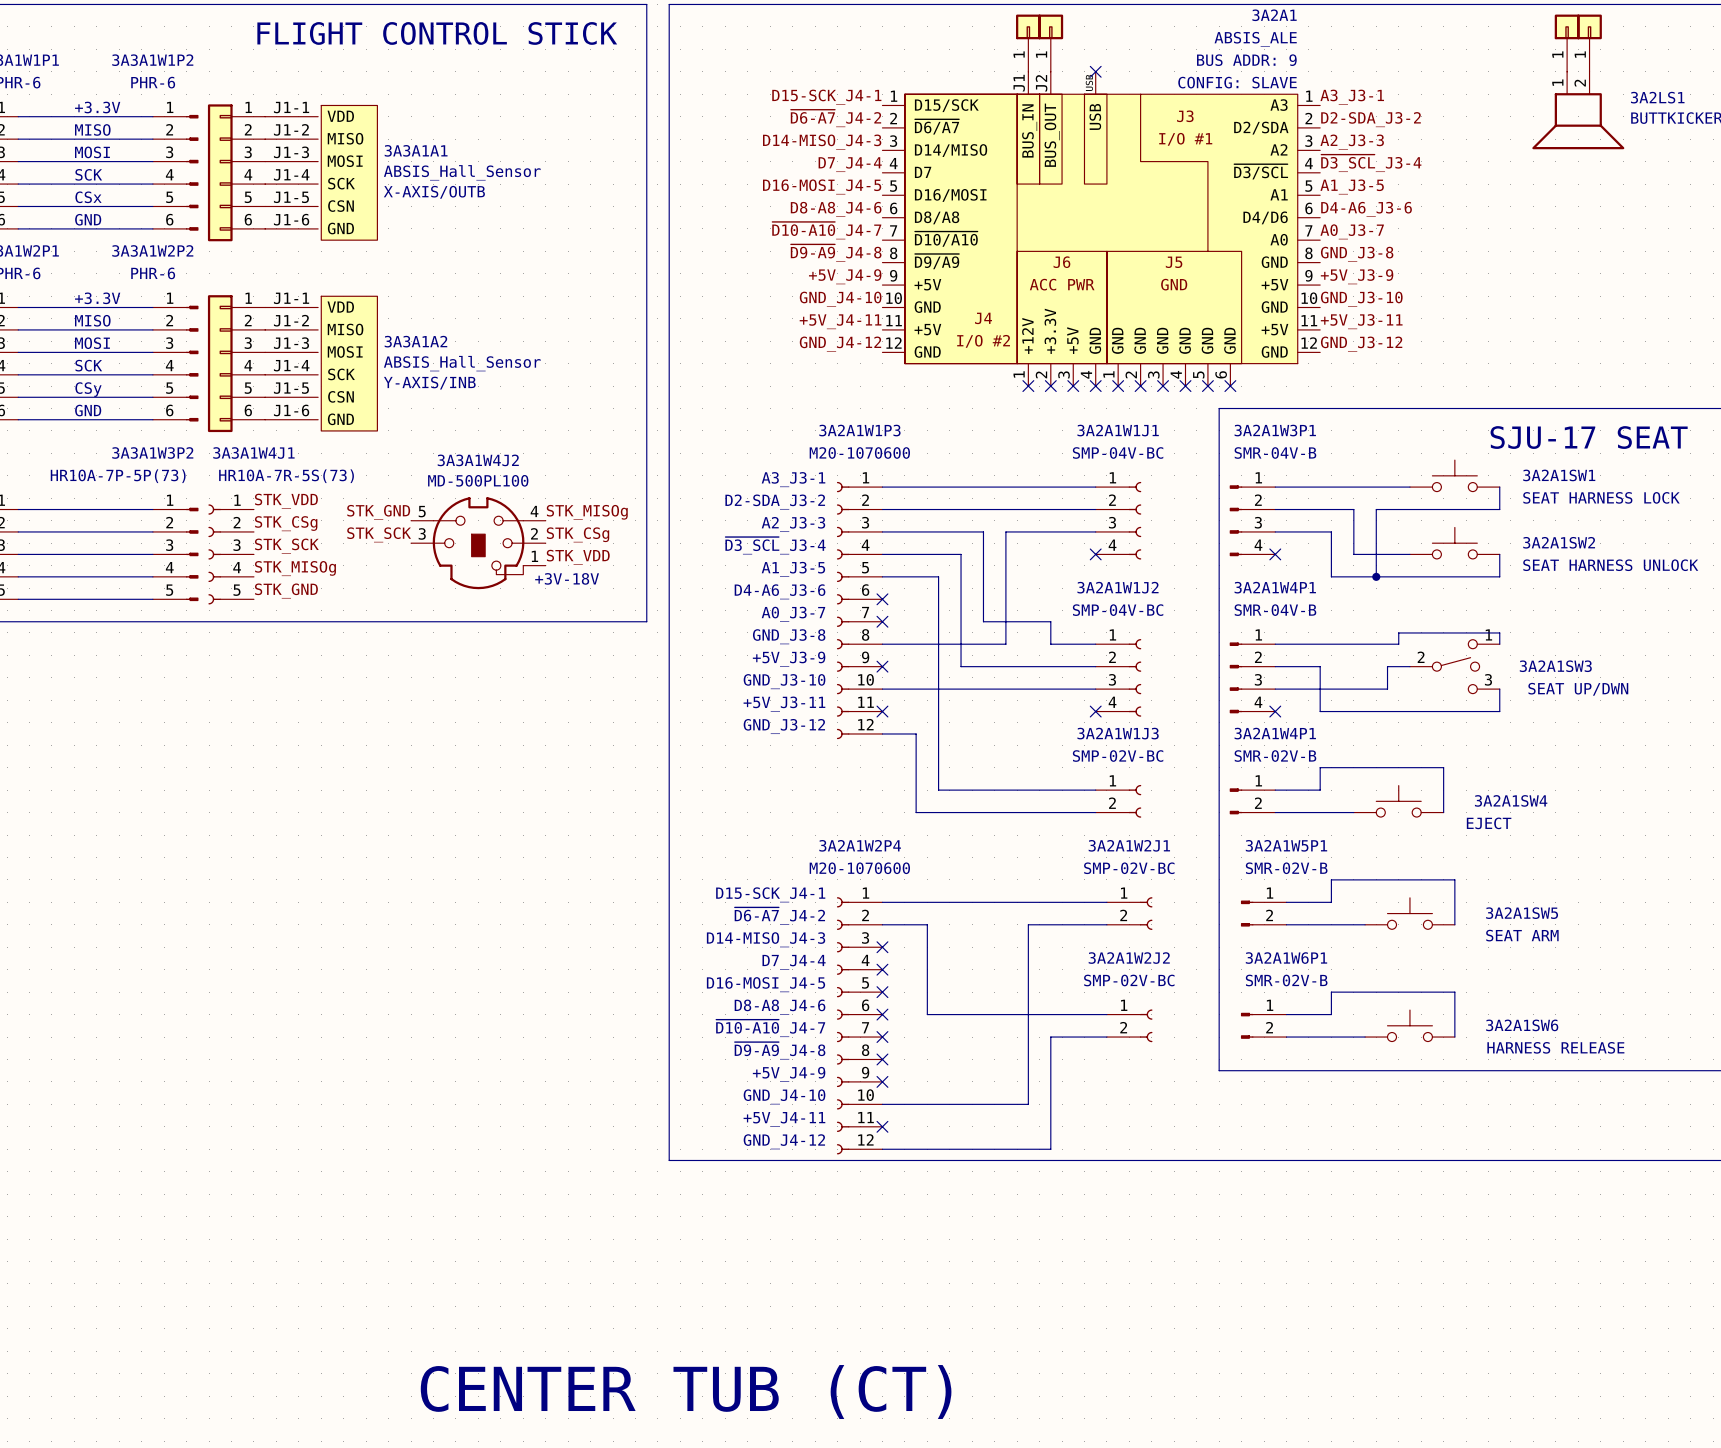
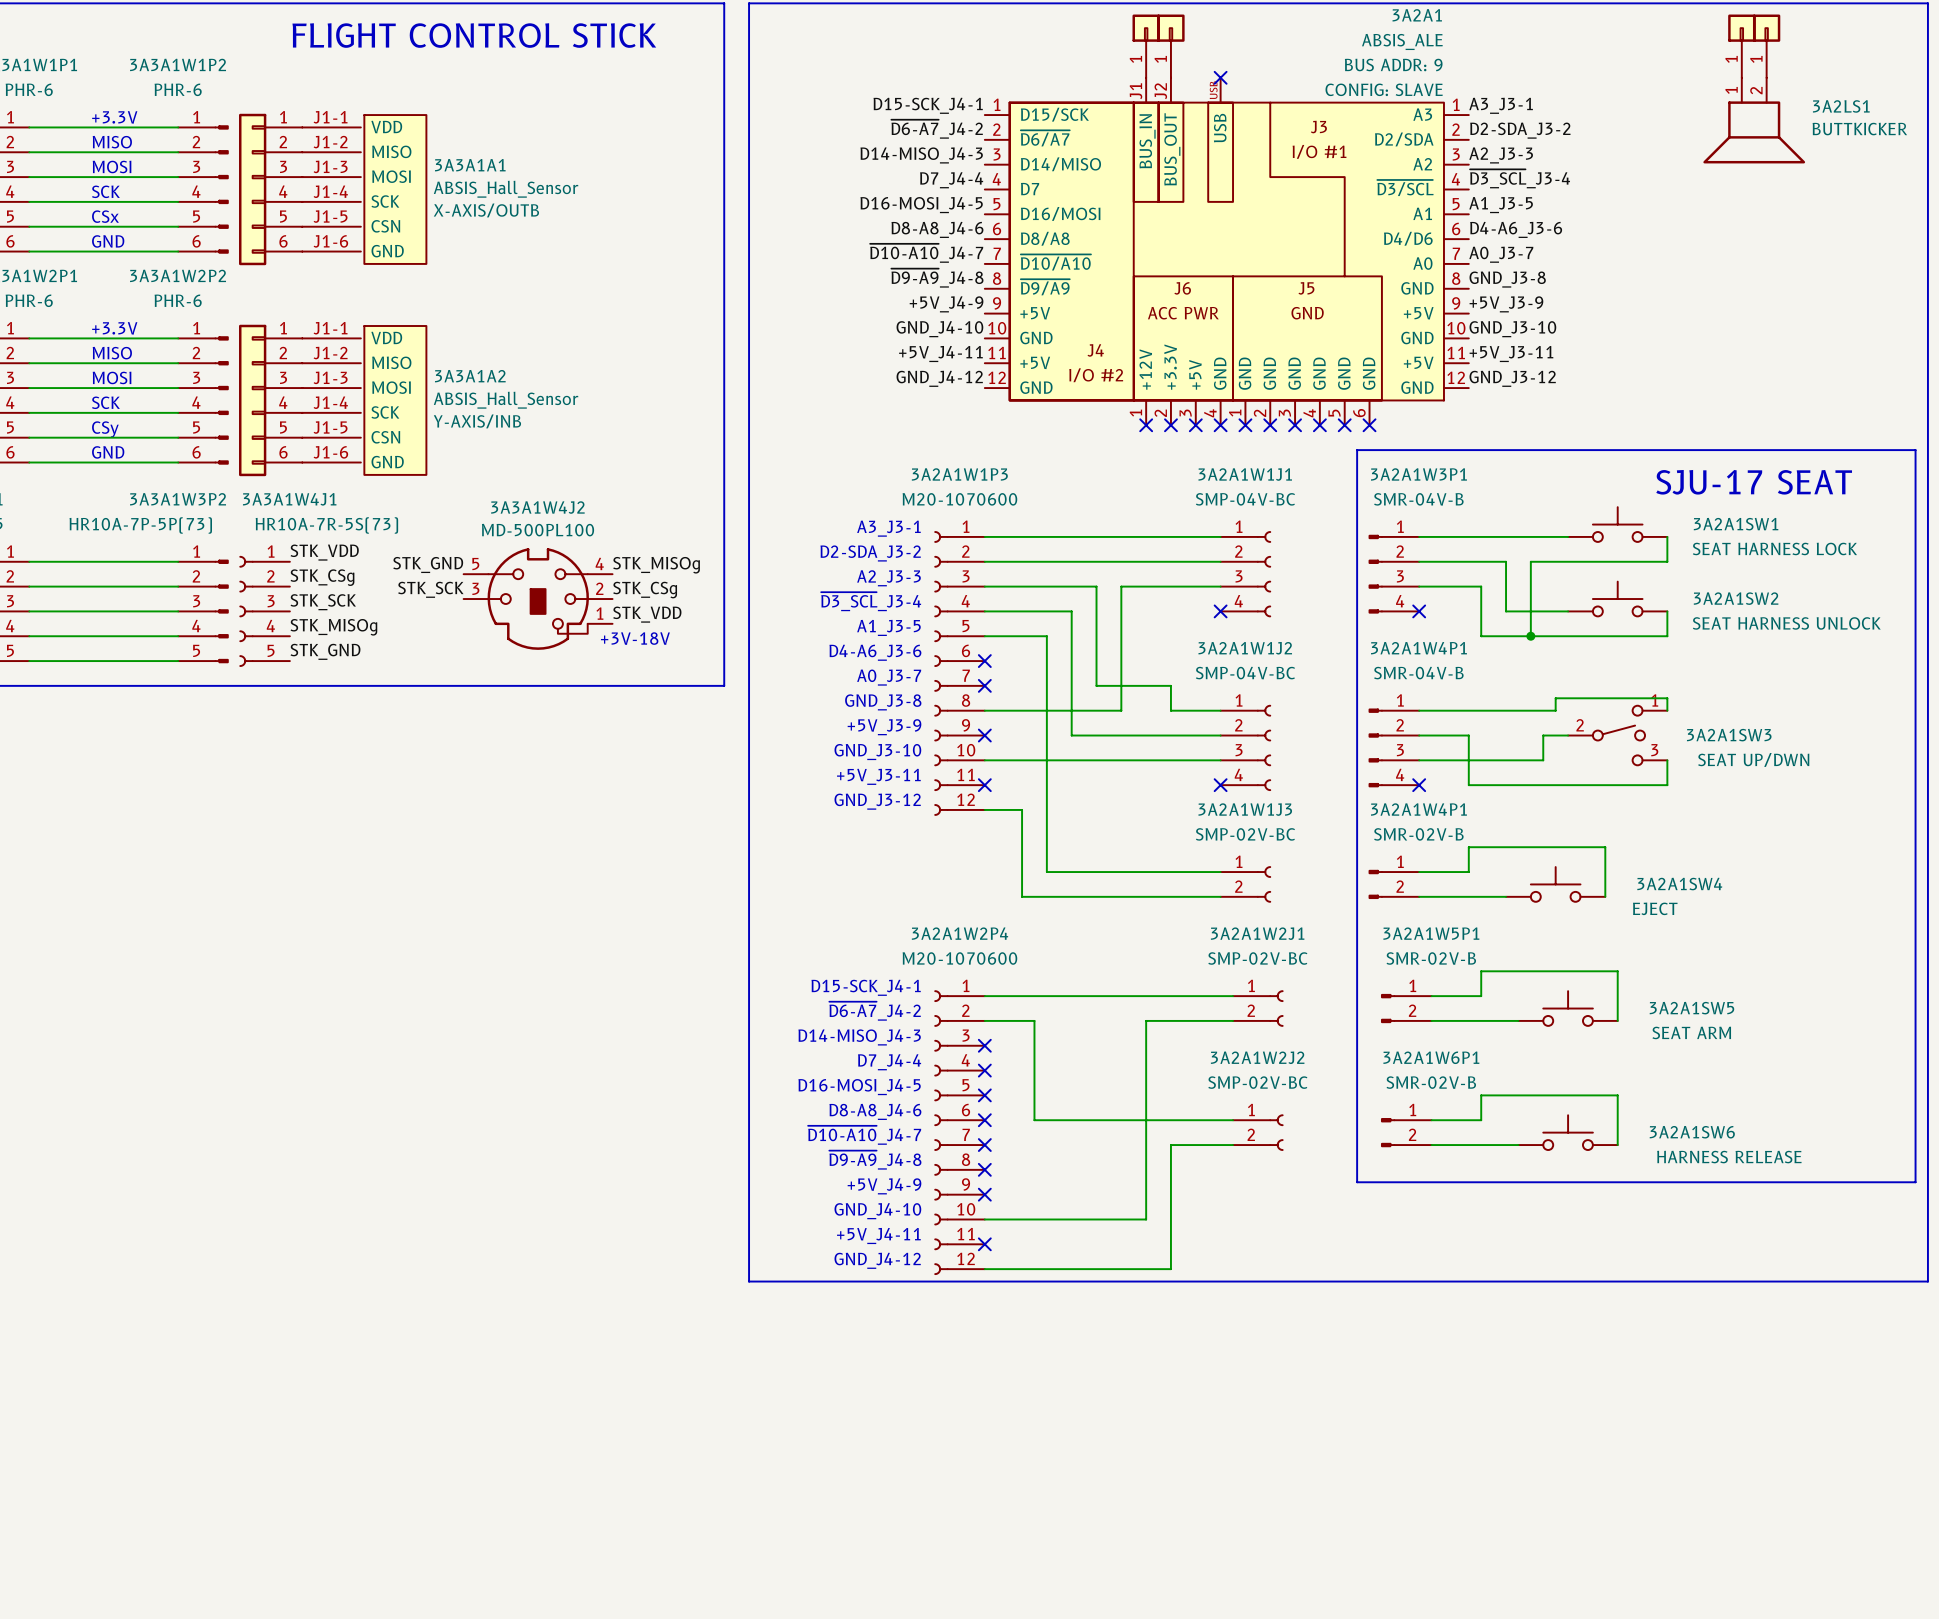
text: CENTER TUB (CT) (686, 1392) -> none

